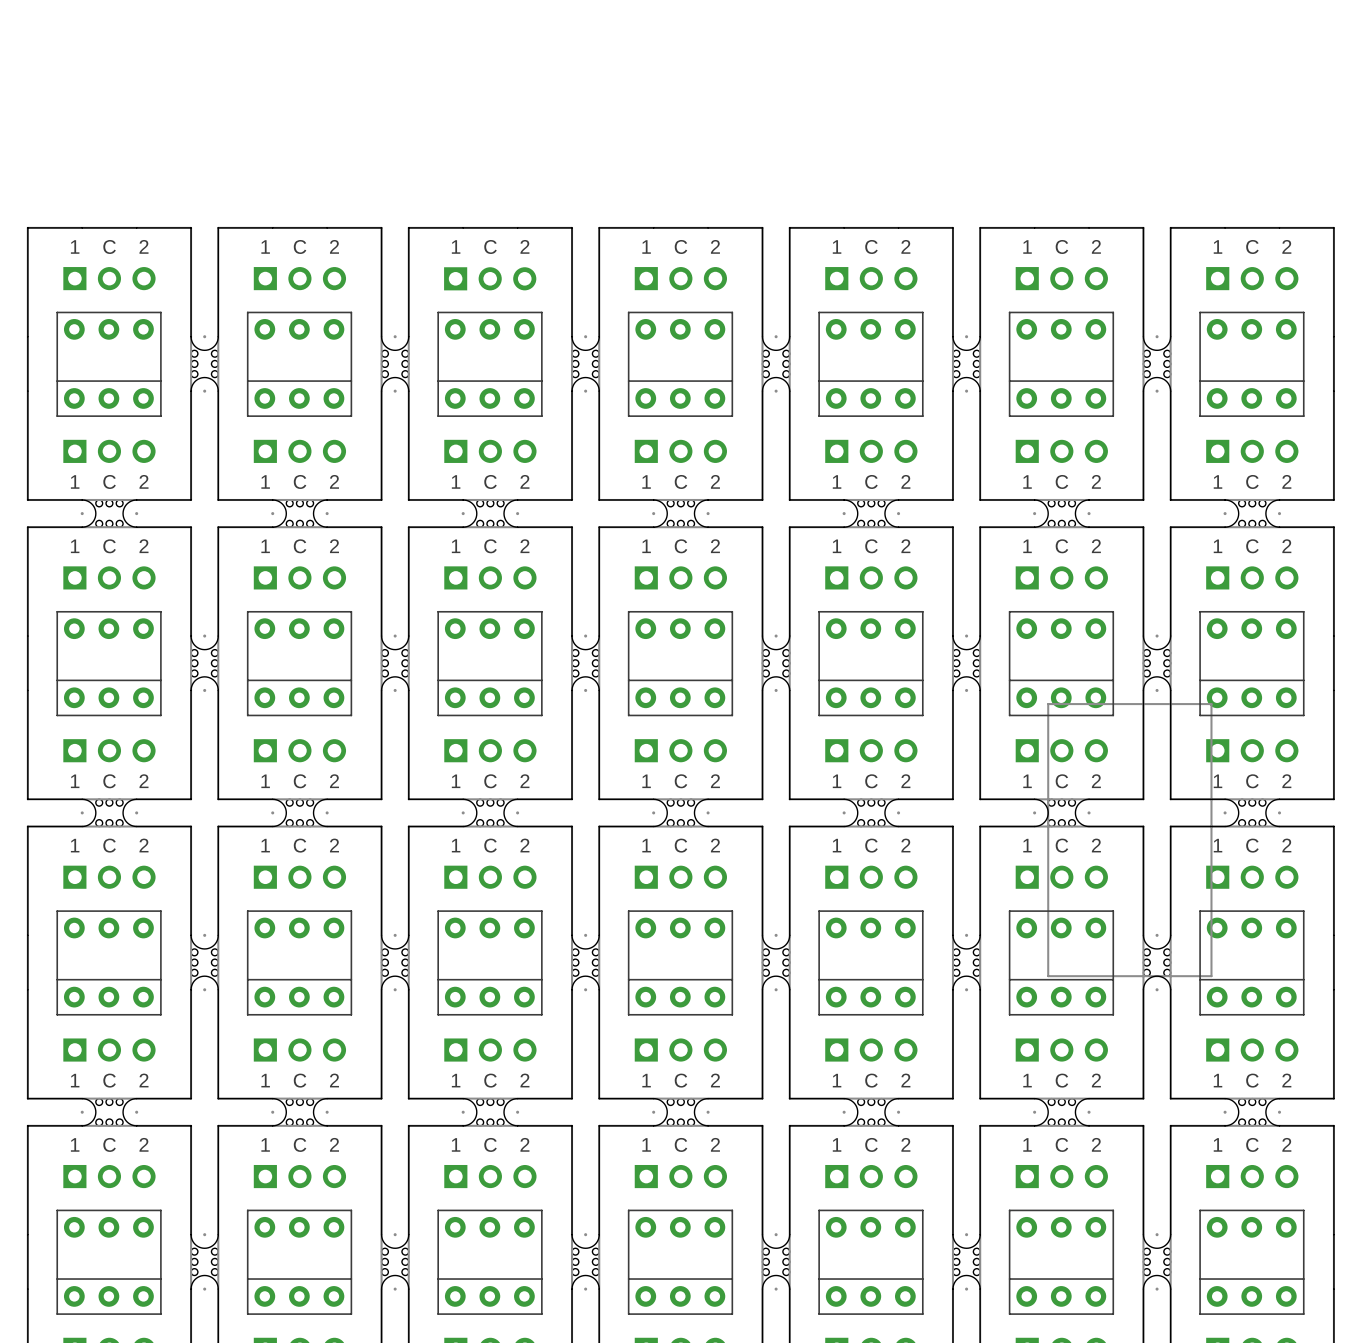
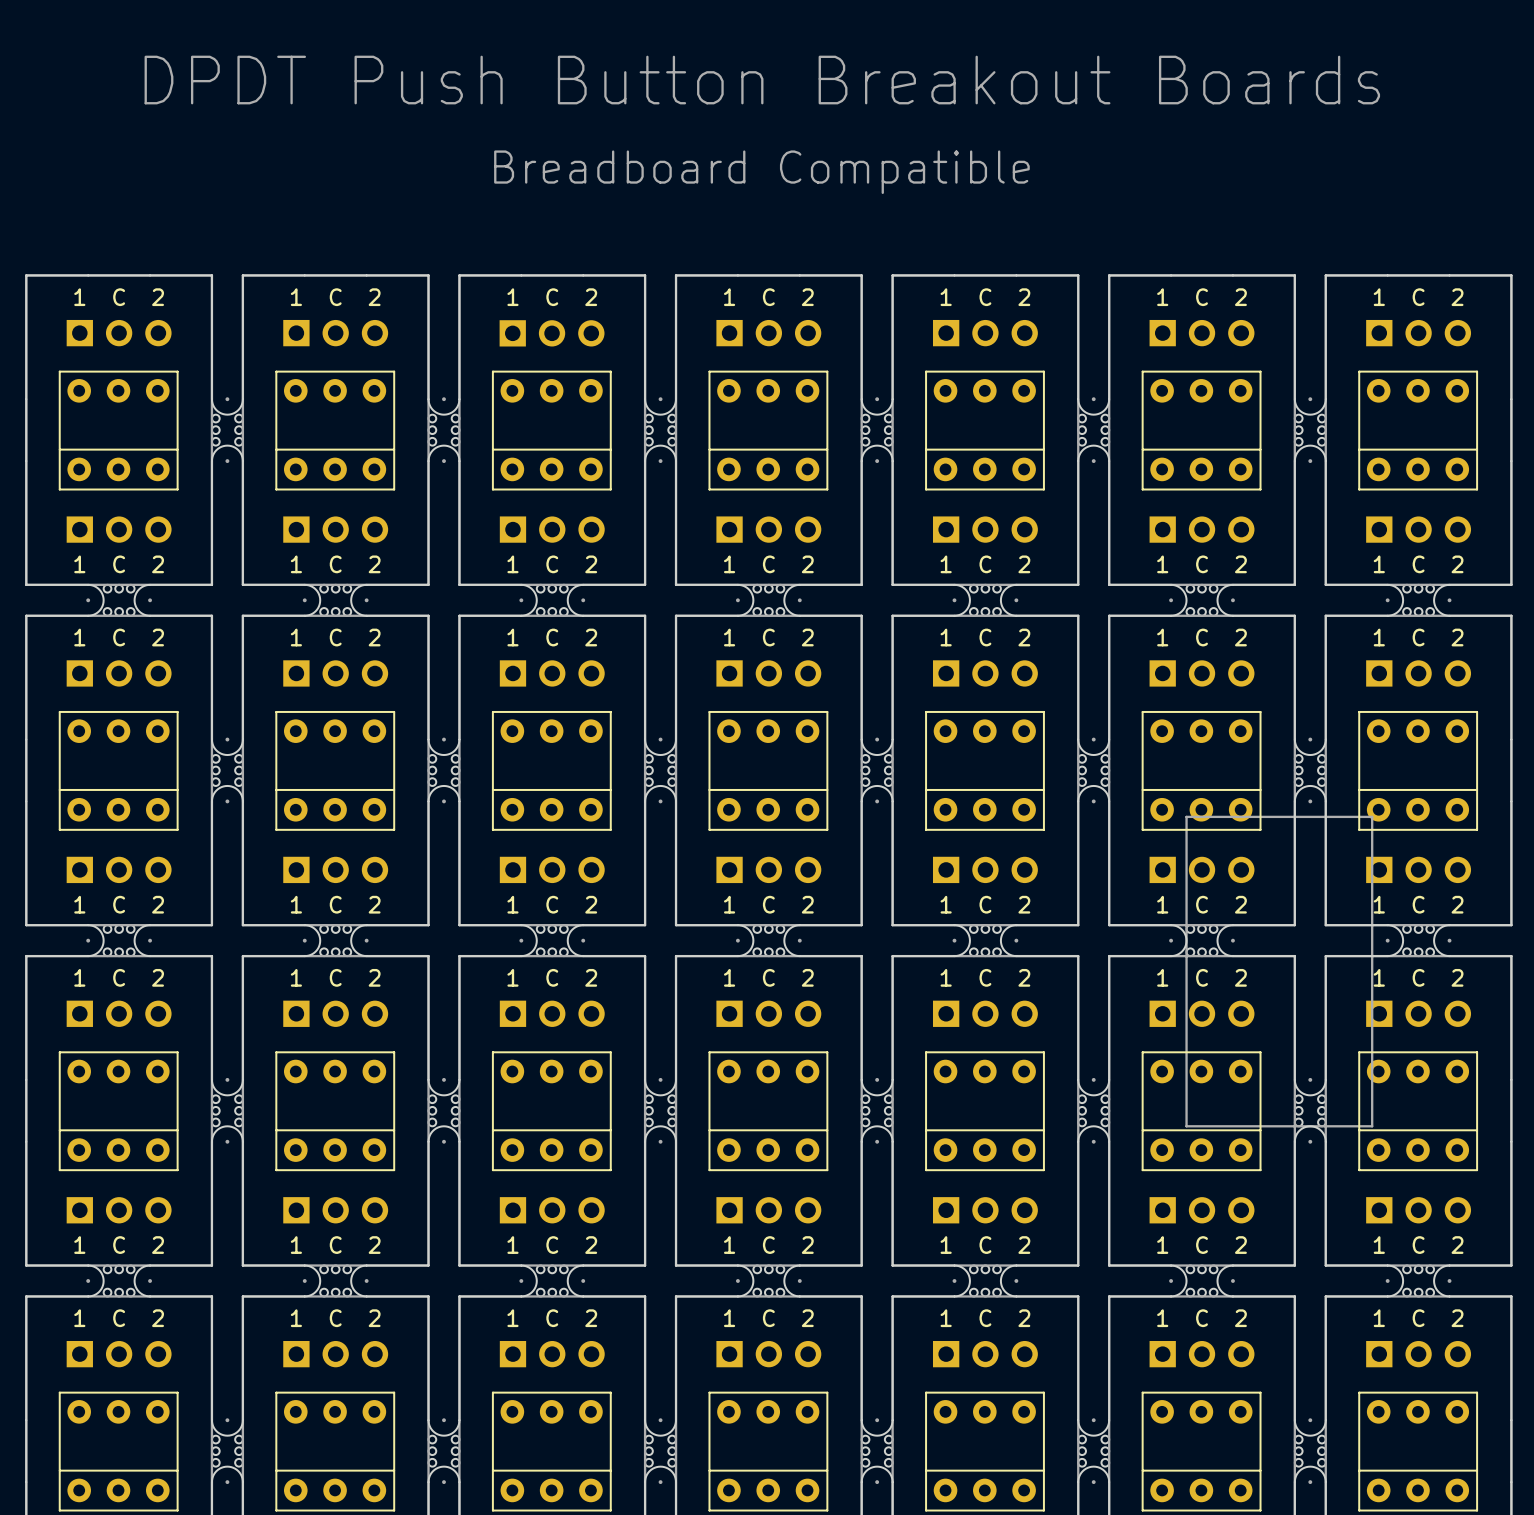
text: none -> DPDT Push Button Breakout Boards (762, 80)
text: none -> Breadboard Compatible (761, 172)

